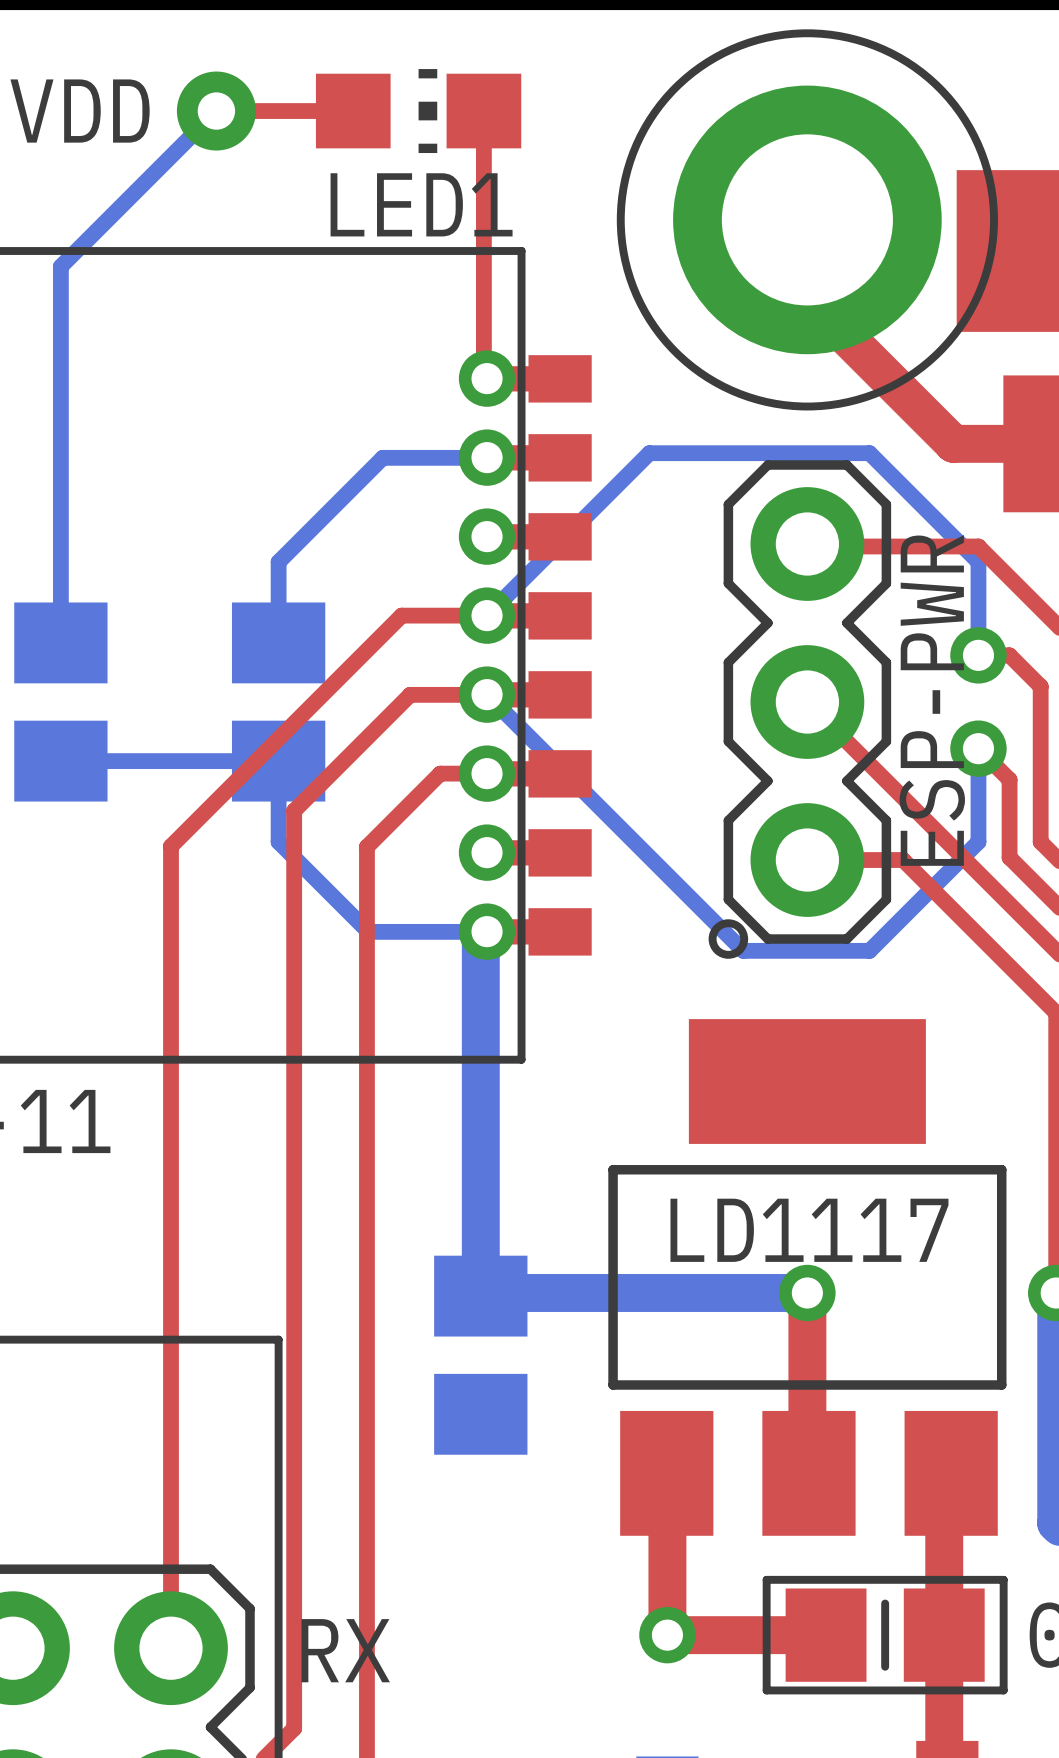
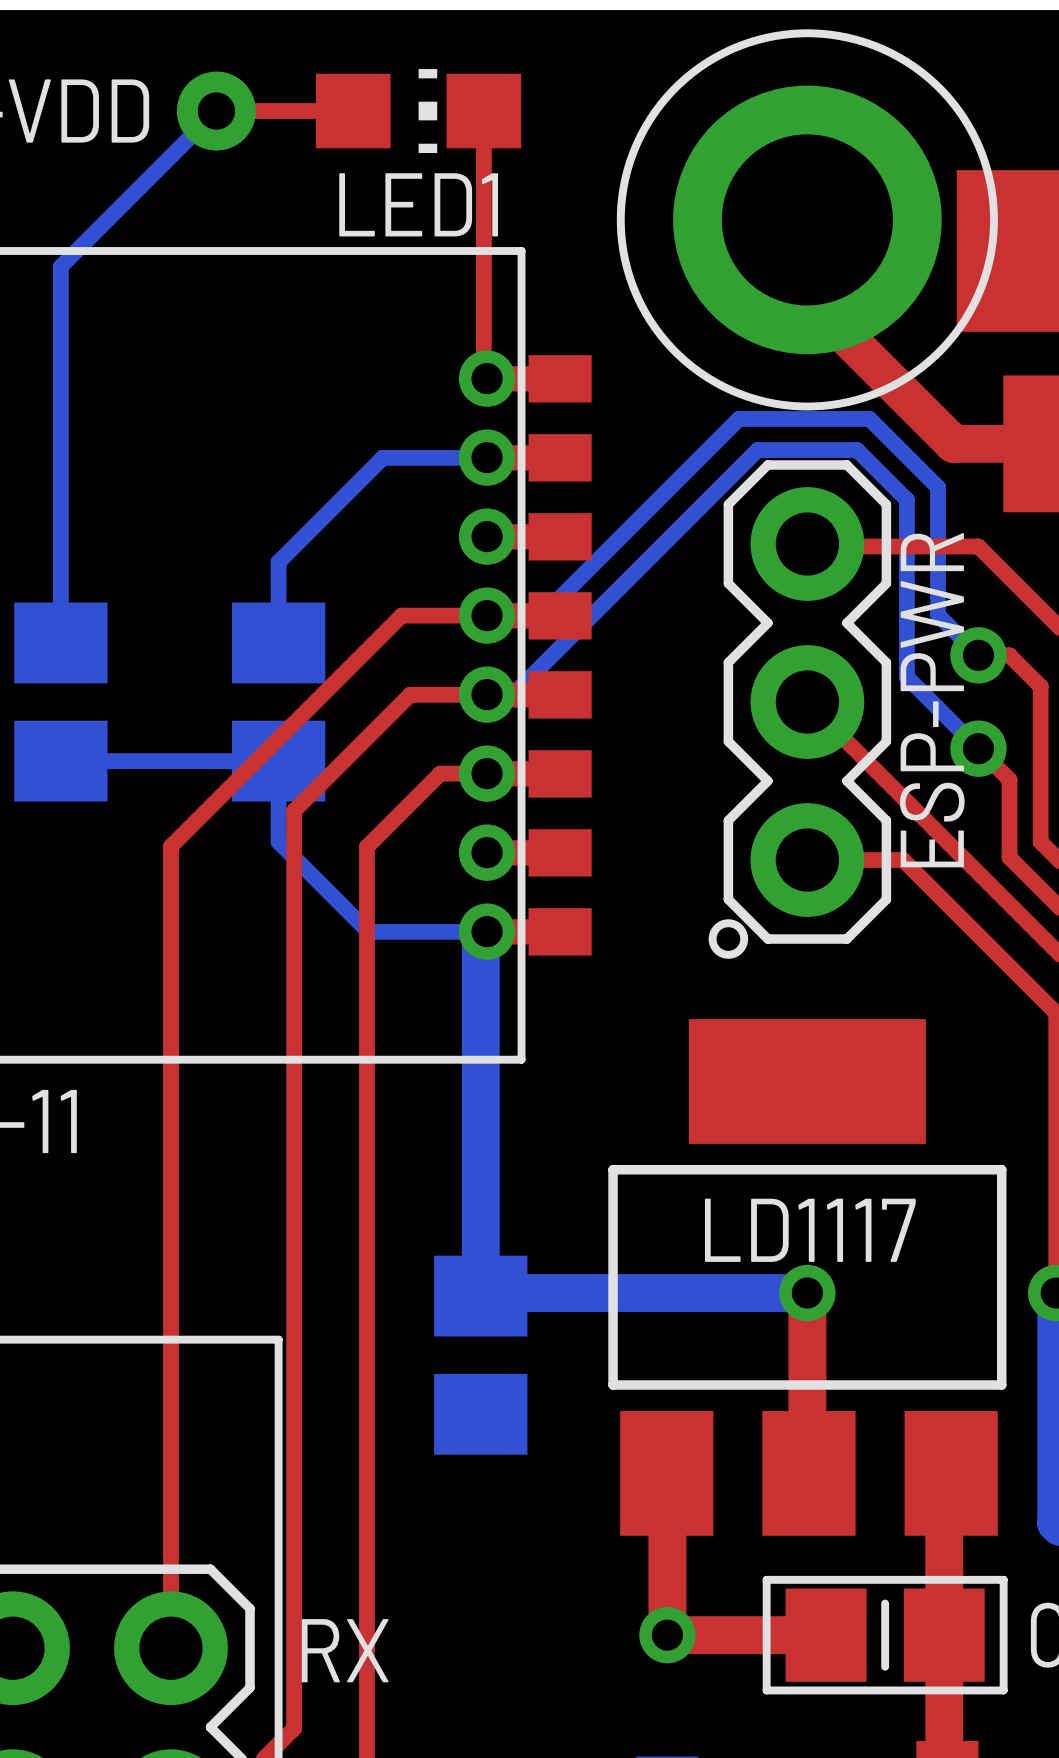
bottom track: (487, 615) (649, 453) (869, 453) (978, 562) (978, 655) -> (487, 615) (542, 615) (738, 418) (869, 418) (938, 487) (938, 614) (978, 655)
bottom track: (487, 694) (743, 950) (869, 950) (978, 841) (978, 748) -> (487, 694) (513, 694) (757, 450) (857, 450) (906, 499) (906, 677) (978, 748)

